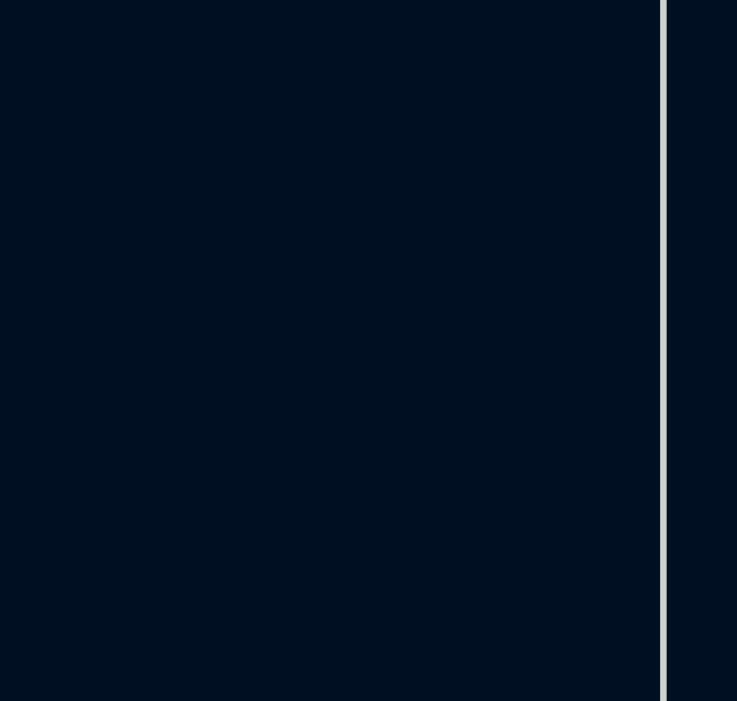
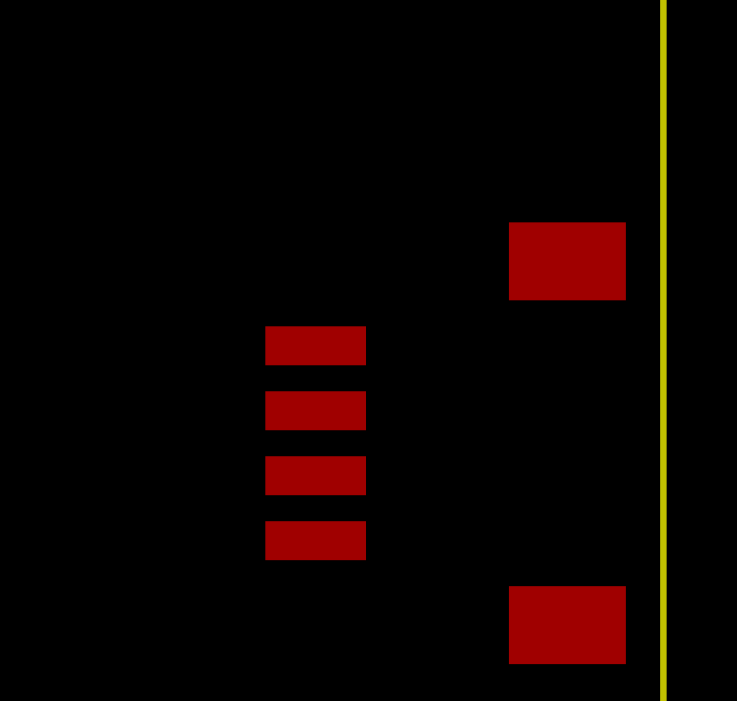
part: none -> (445, 443)

